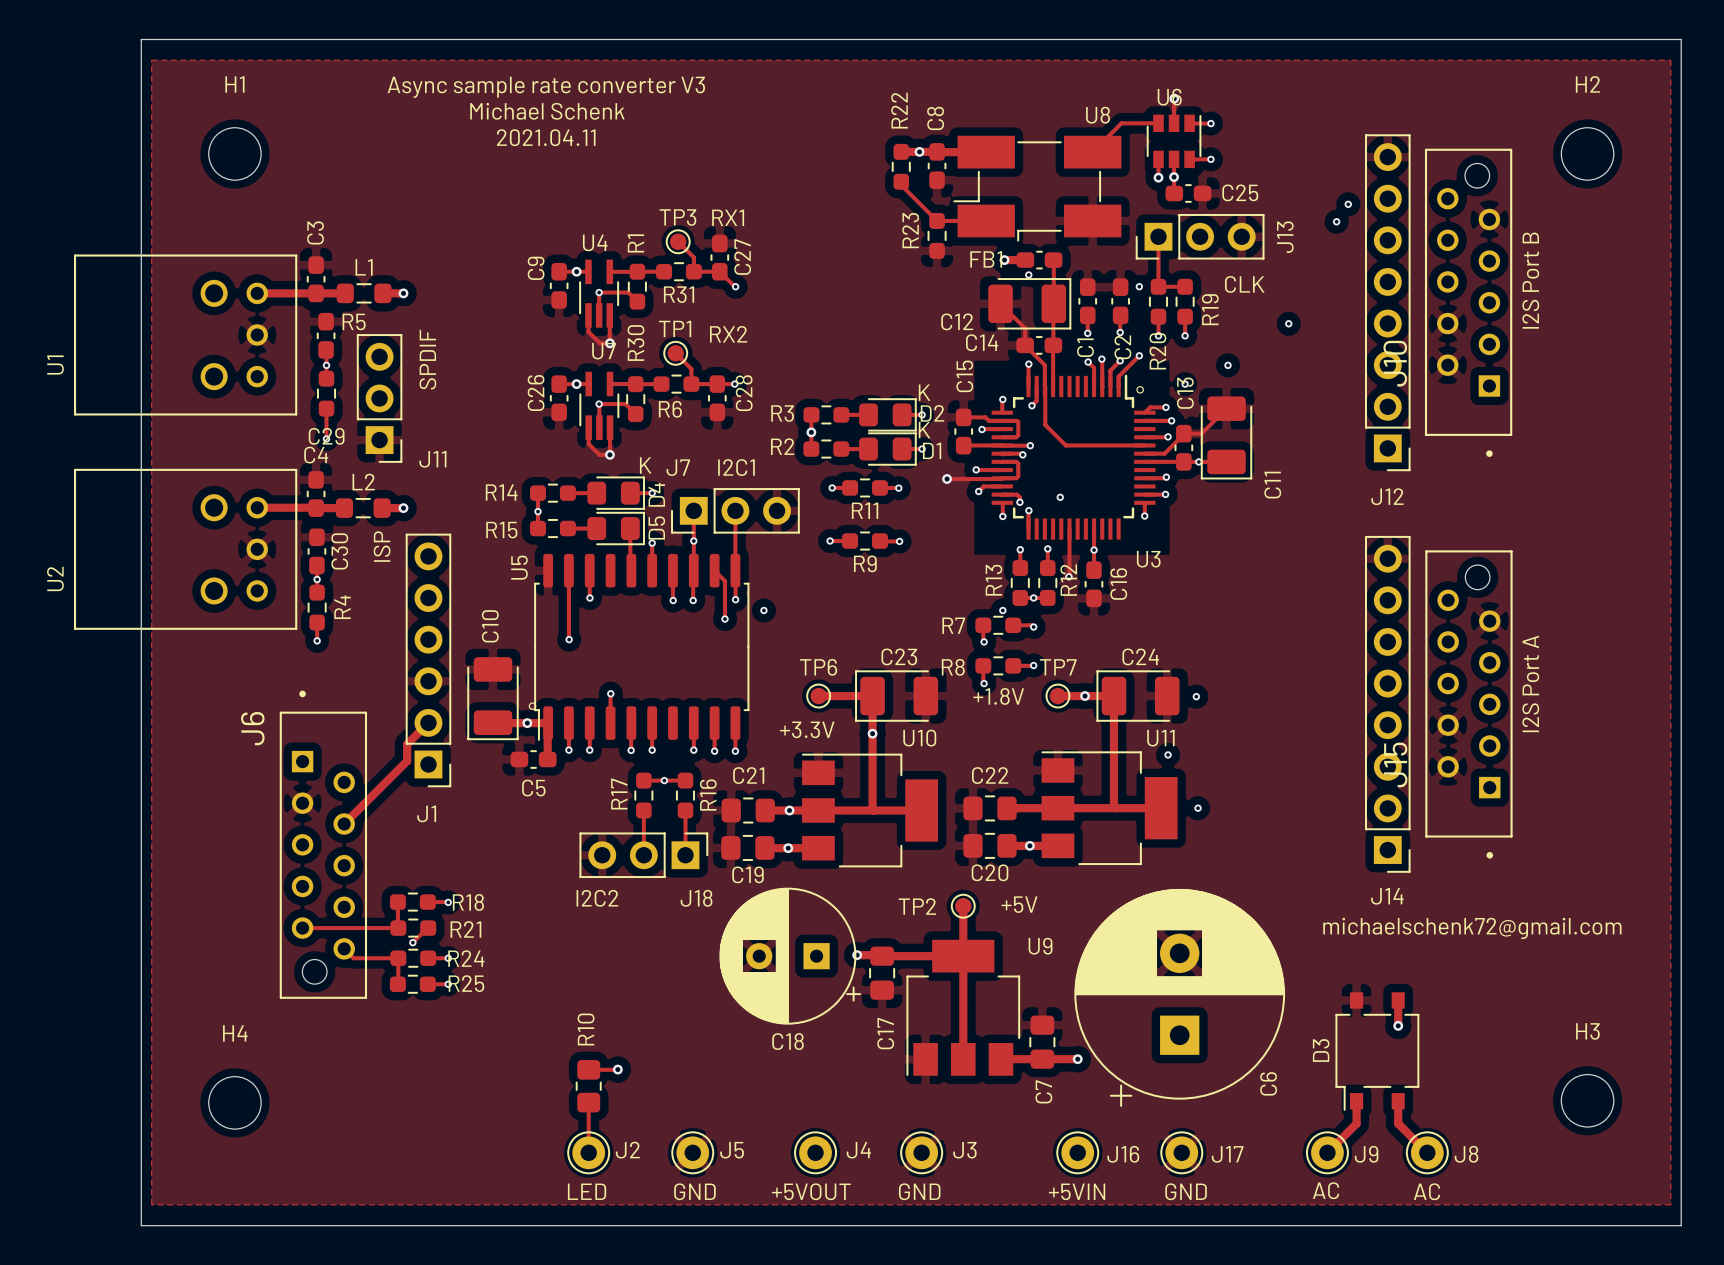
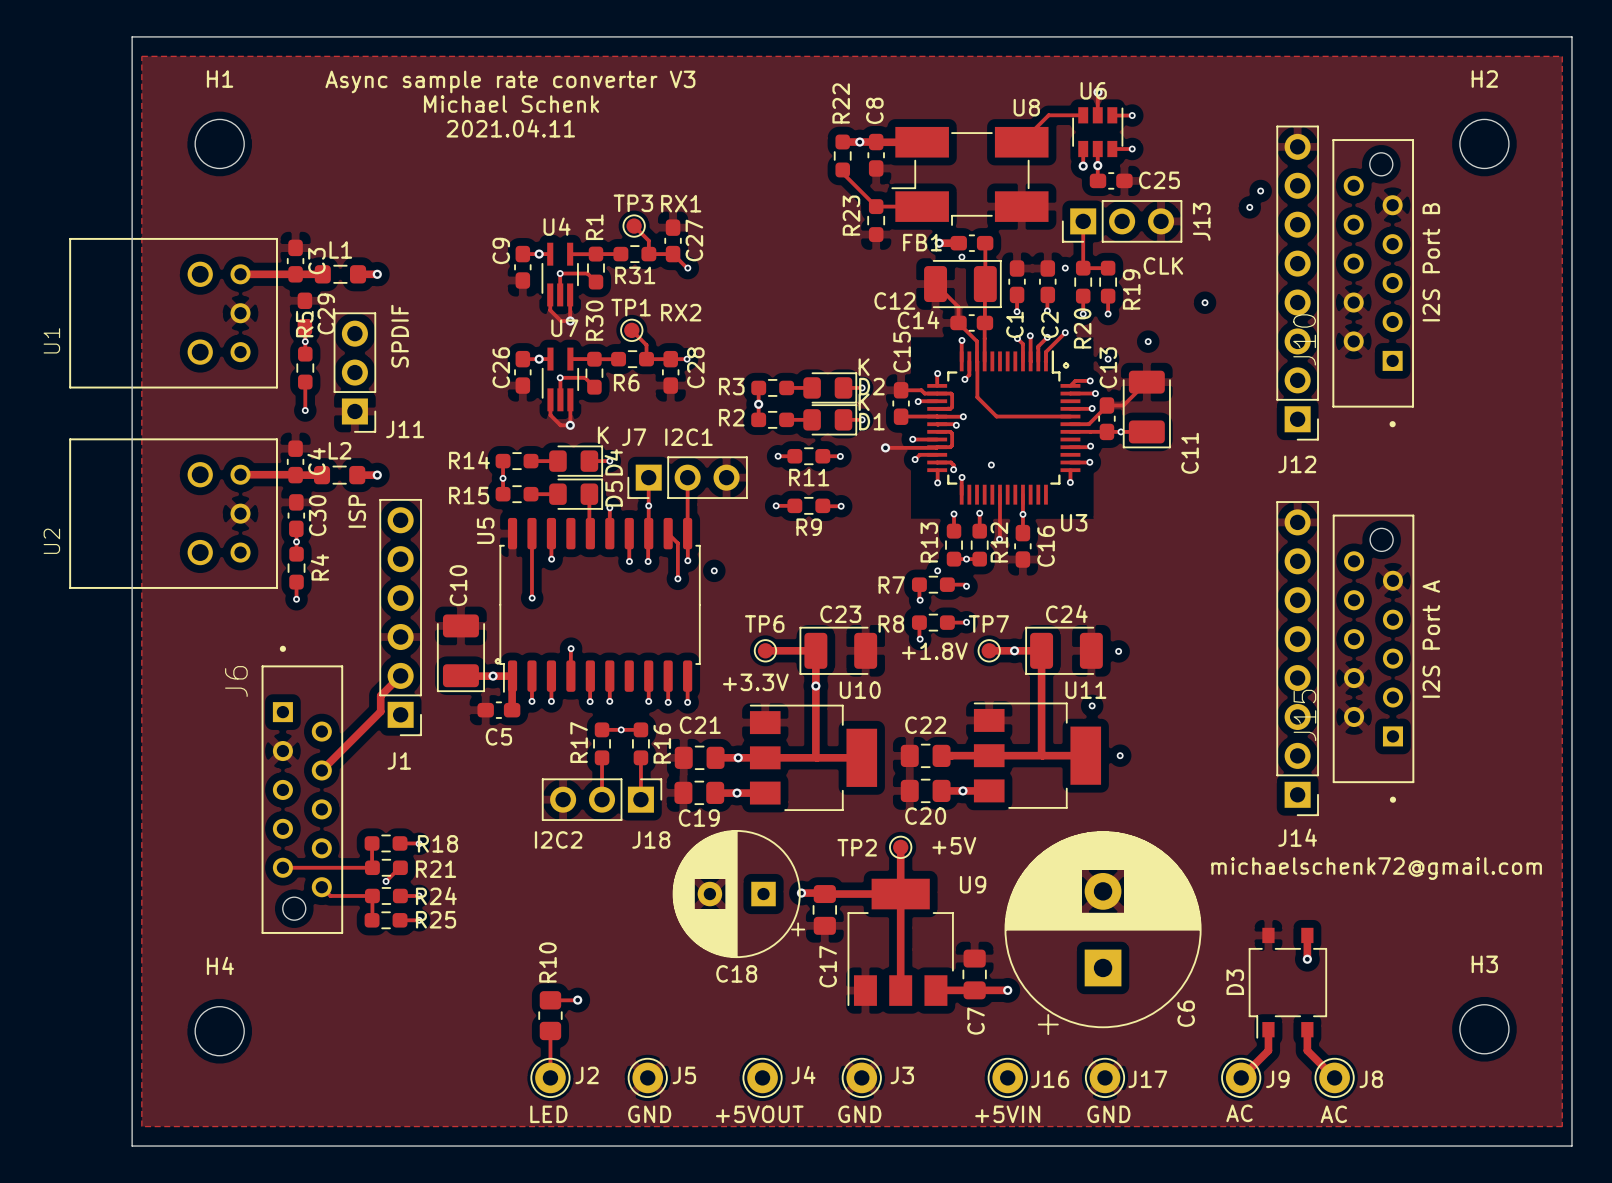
C3 name position: C3 (315, 232) -> C3 (316, 261)
R5 name rotation: 0° (354, 321) -> 90° counterclockwise (304, 324)
C29 name rotation: 0° (326, 436) -> 90° counterclockwise (326, 313)
C29 name position: C29 (326, 436) -> C29 (326, 313)
C4 name rotation: 0° (316, 455) -> 90° counterclockwise (316, 461)
C4 name position: C4 (316, 455) -> C4 (316, 461)

